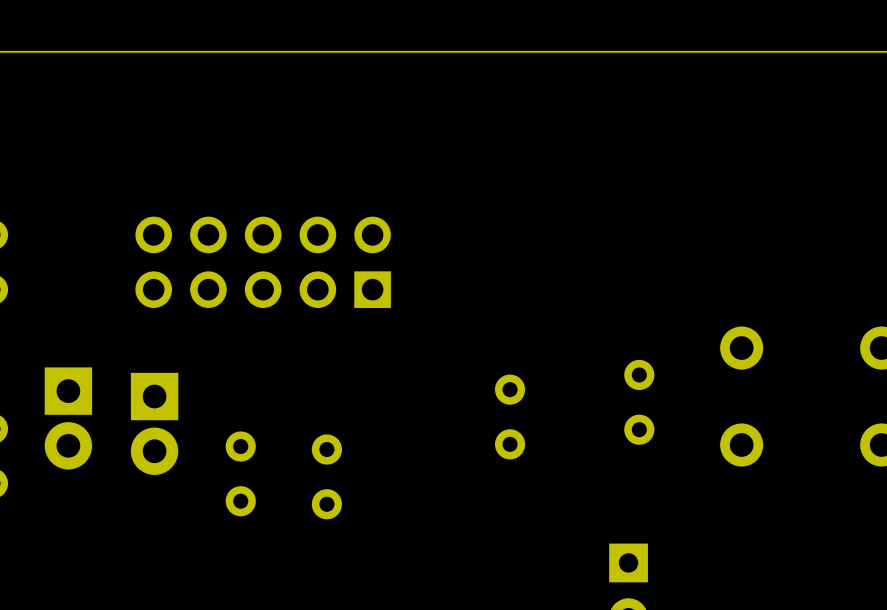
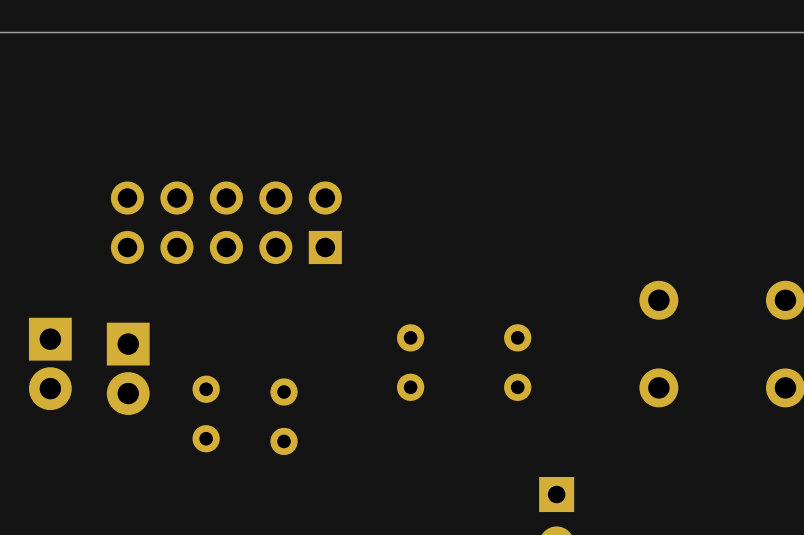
part: (639, 402) -> none
part: none -> (410, 362)
part: (510, 416) -> none
part: none -> (517, 362)

